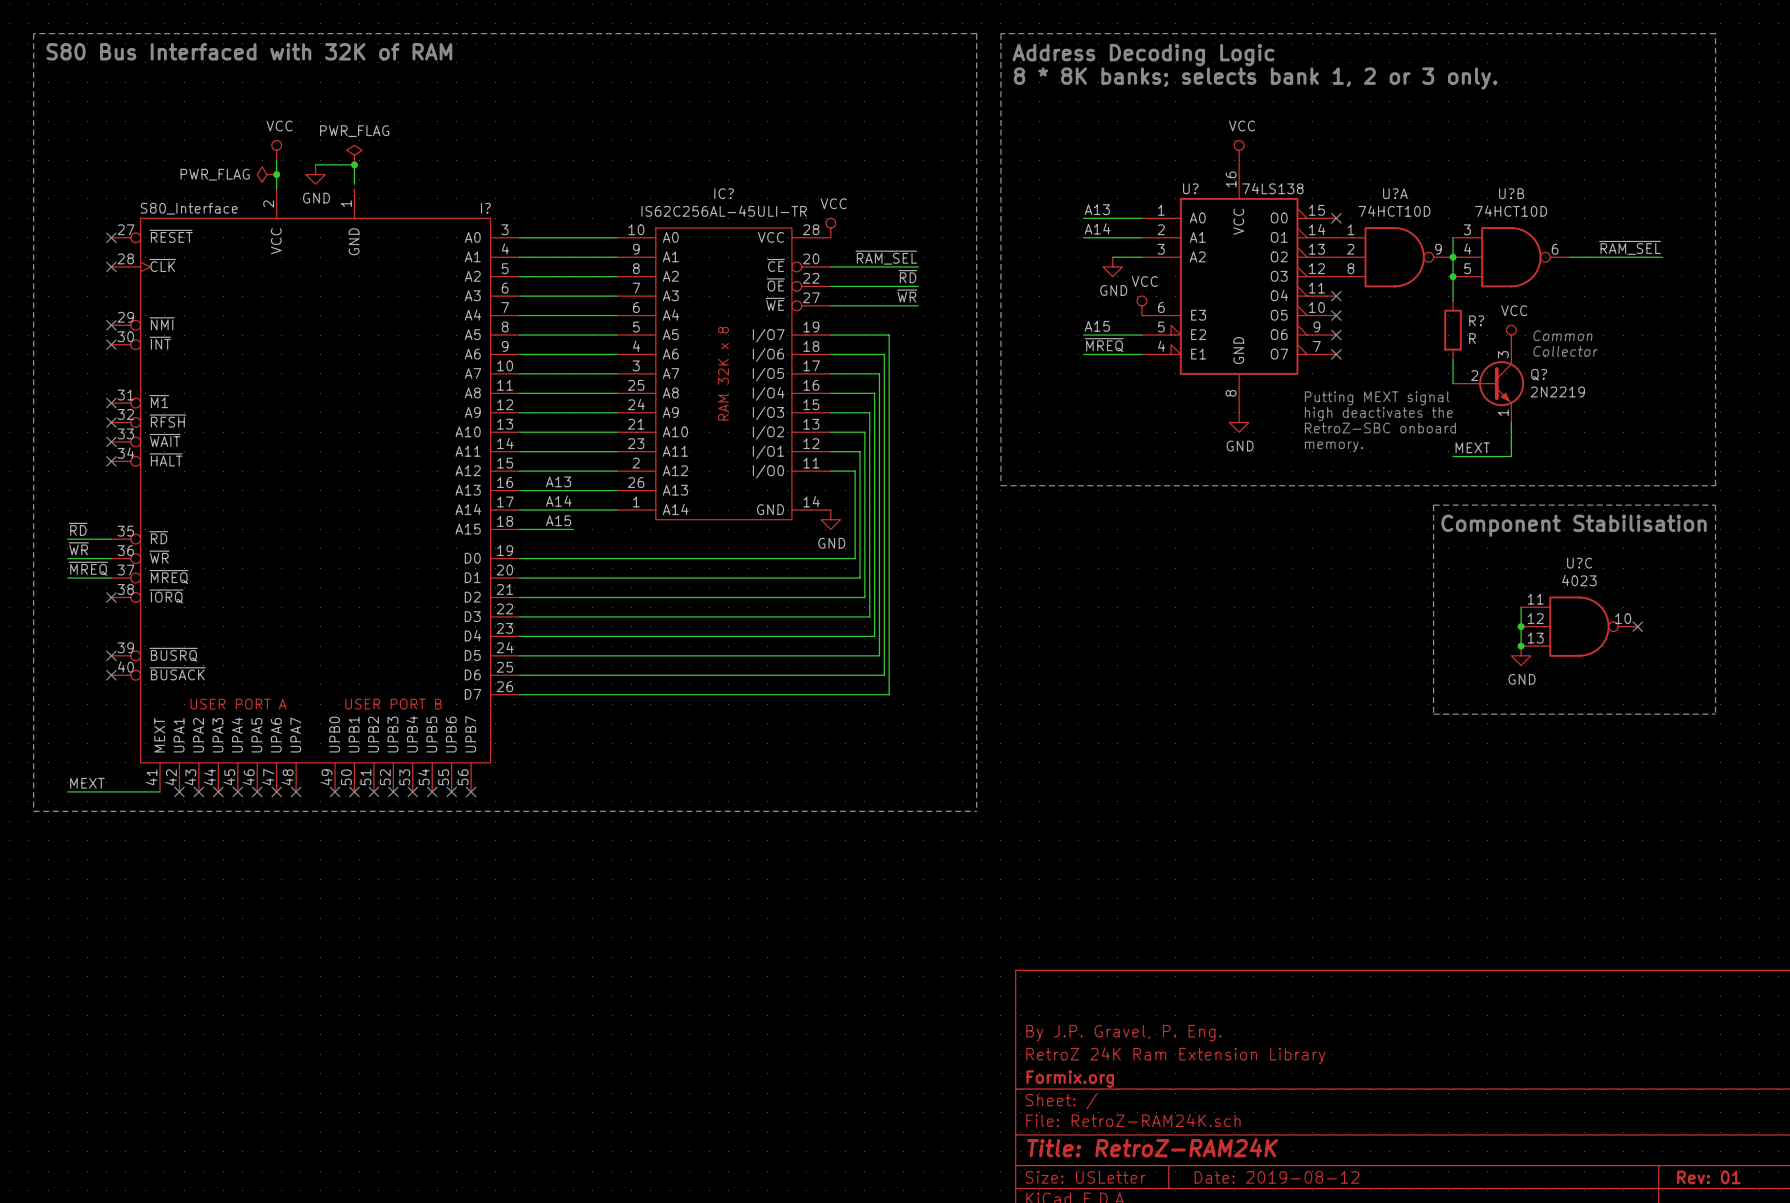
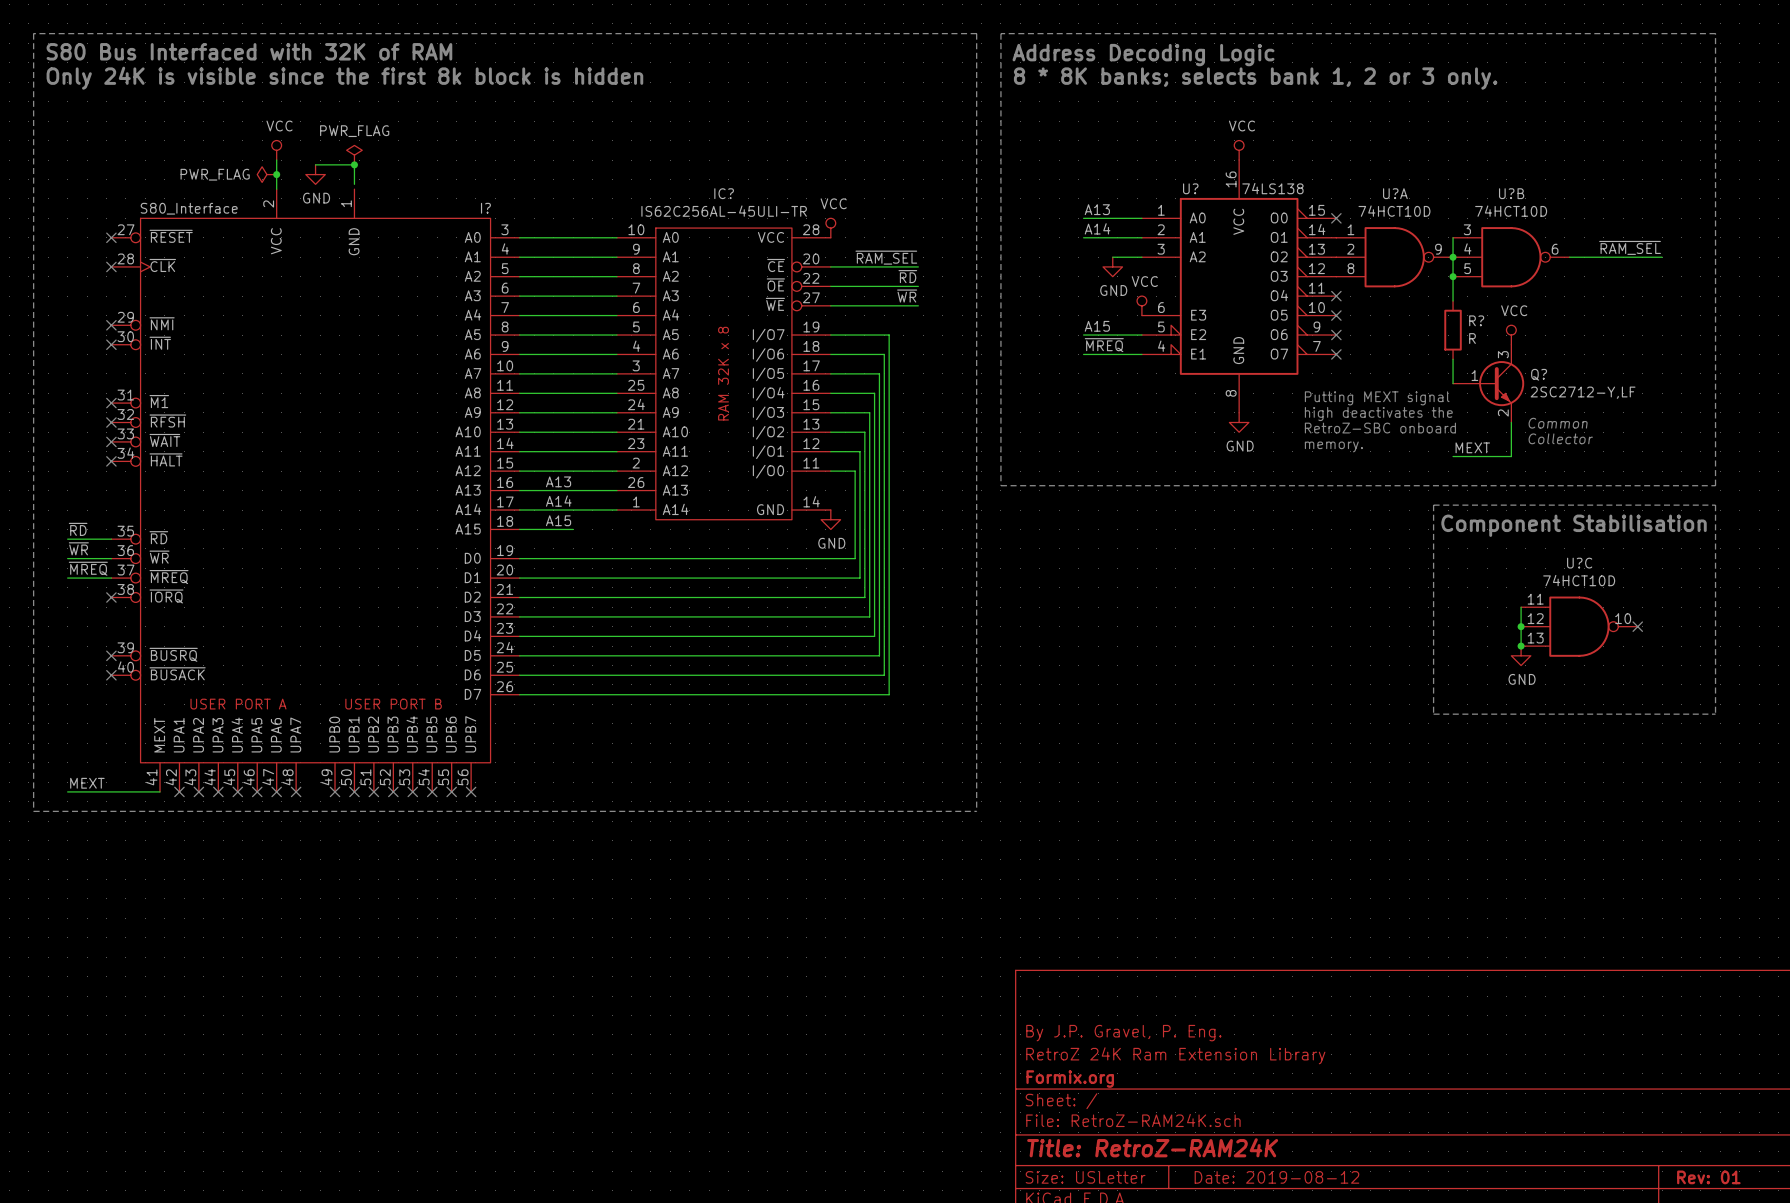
text: none -> Only 24K is visible since the first 8k block is hidden (344, 78)
text position: Common (1562, 335) -> Common (1558, 423)
text position: Collector (1565, 351) -> Collector (1560, 438)
Q? pin number: 2 (1474, 375) -> 1 (1474, 375)
Q? value: 2N2219 (1557, 392) -> 2SC2712-Y,LF (1583, 392)
Q? pin number: 1 (1503, 412) -> 2 (1503, 413)
U?C value: 4023 (1579, 580) -> 74HCT10D (1579, 580)

